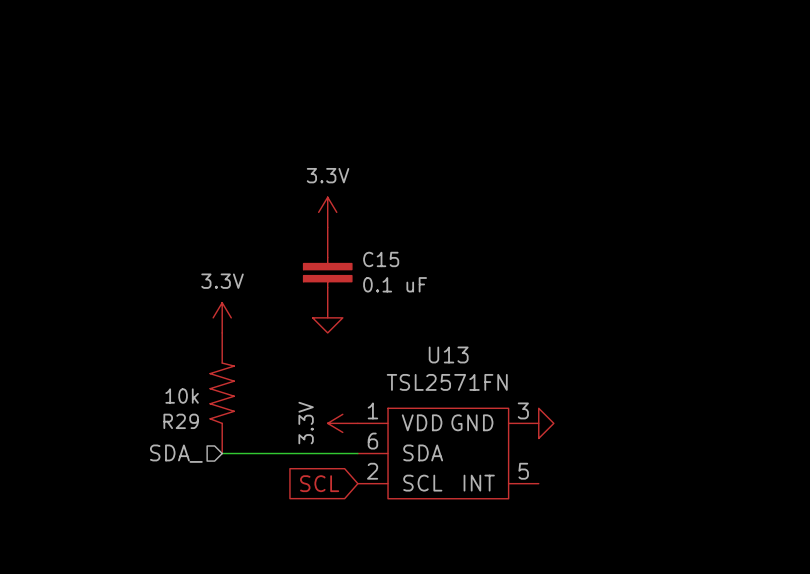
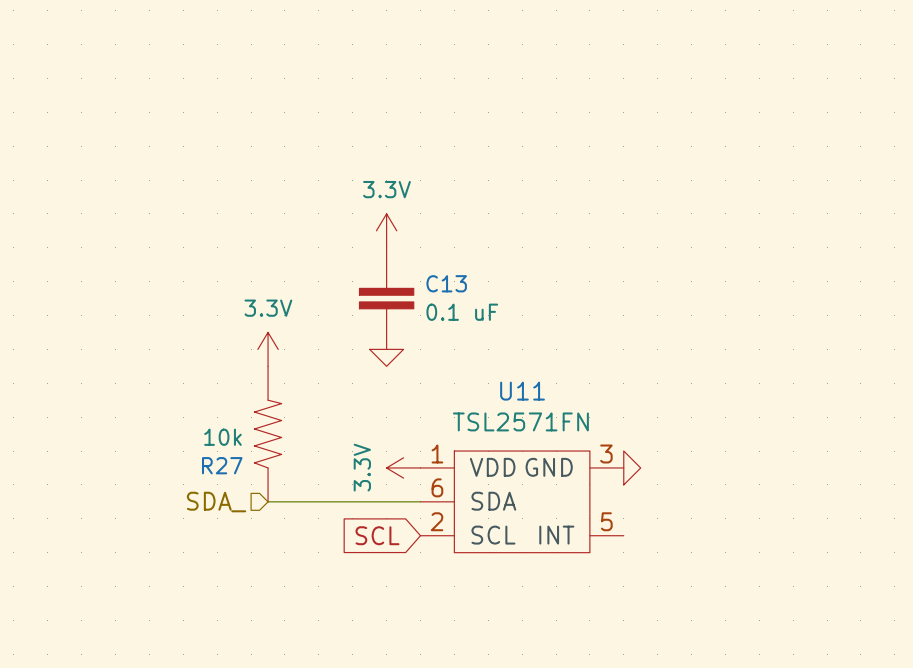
C15 name: C15 (381, 259) -> C13 (446, 283)
U13 name: U13 (448, 354) -> U11 (522, 391)
R29 name: R29 (181, 421) -> R27 (222, 465)

